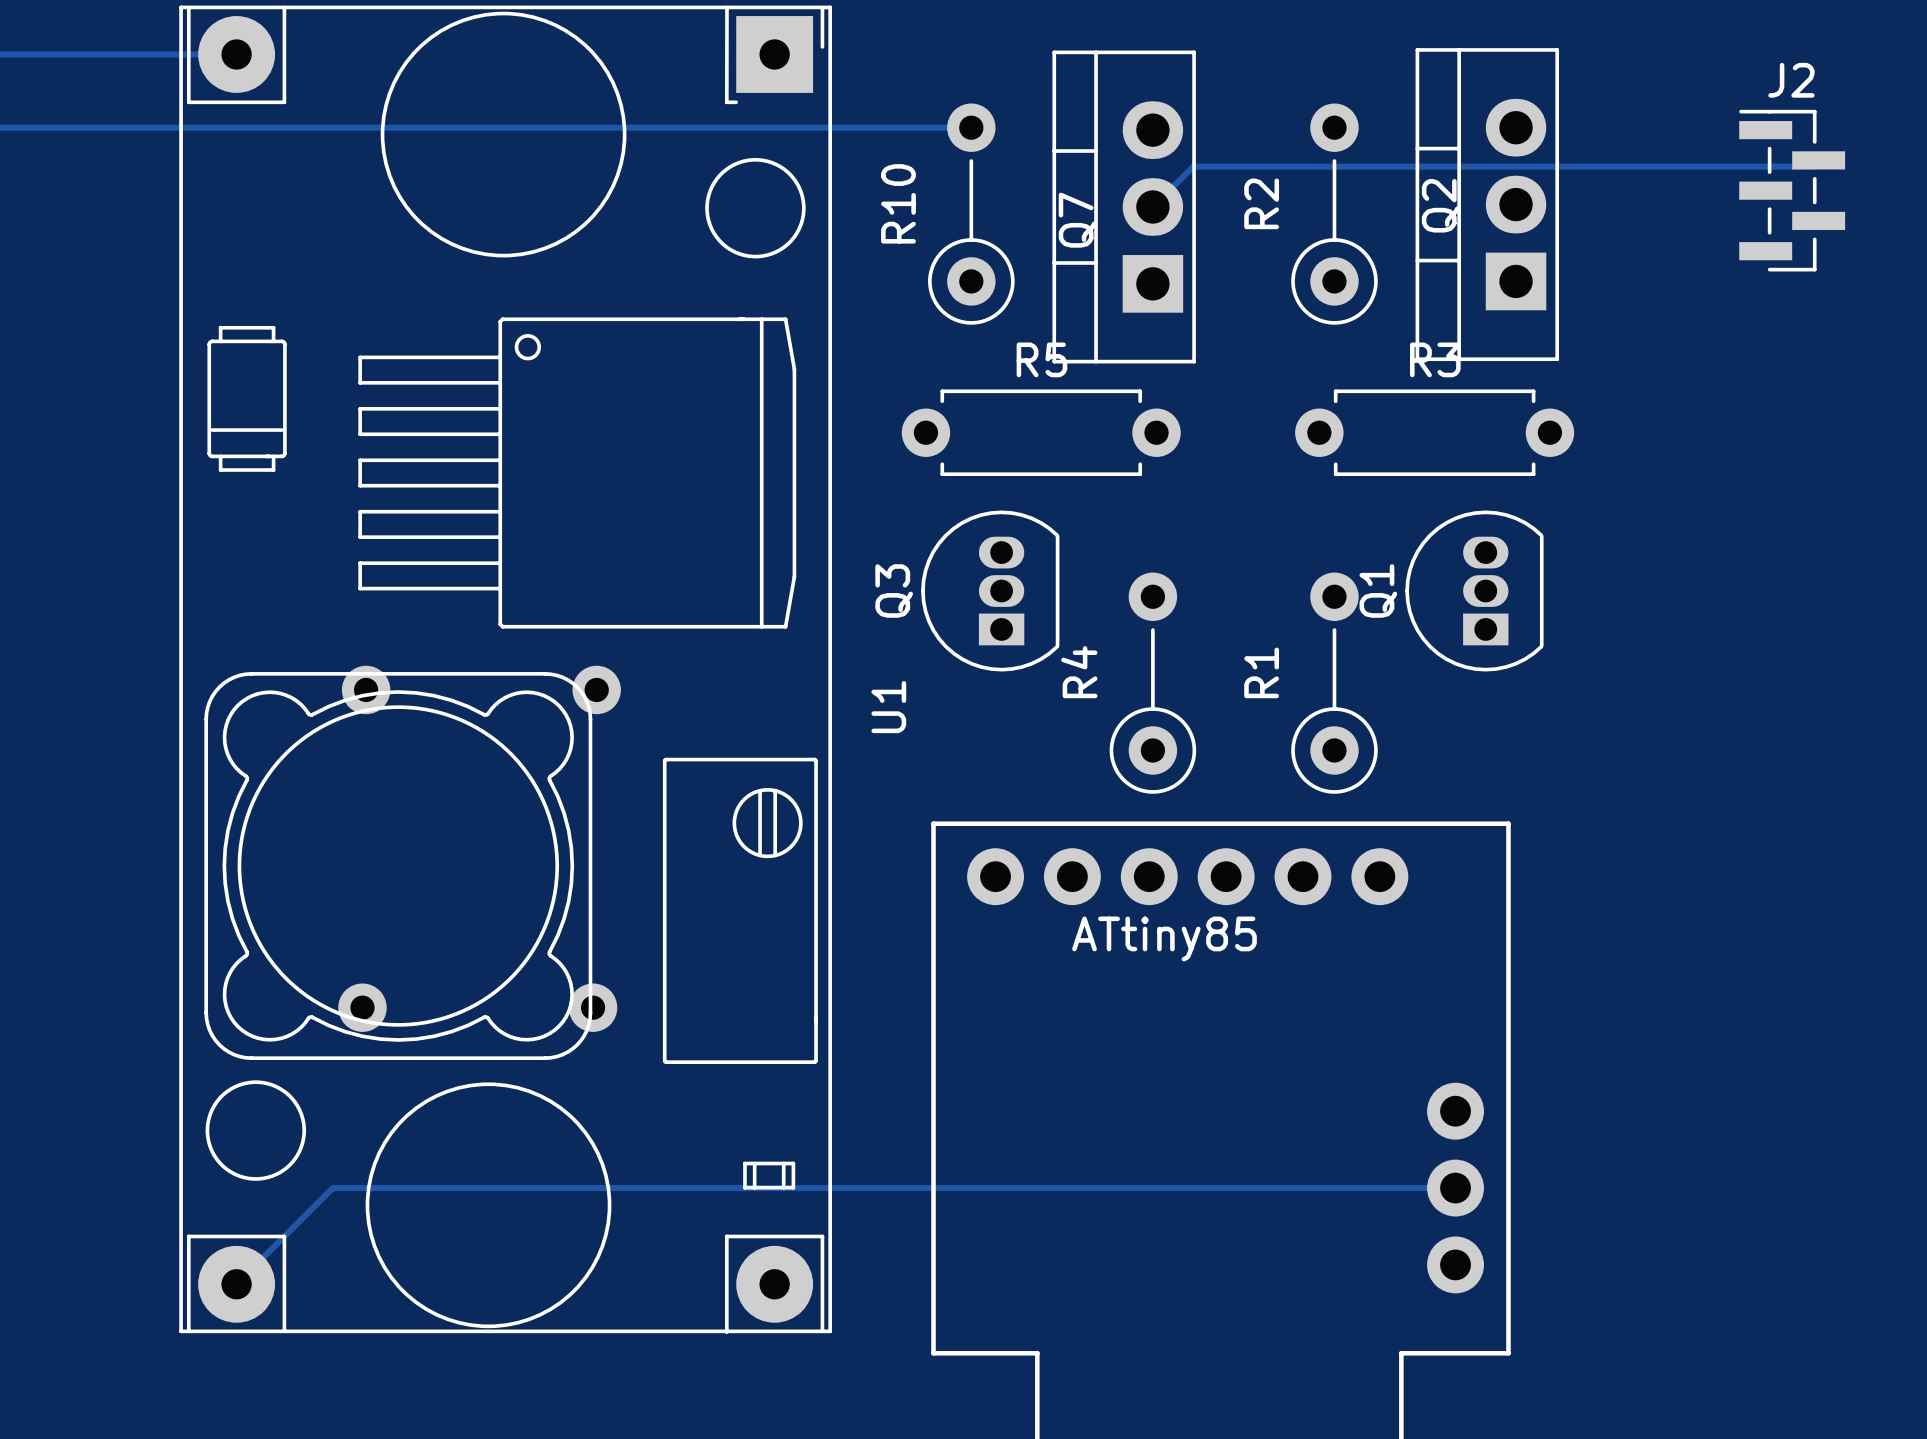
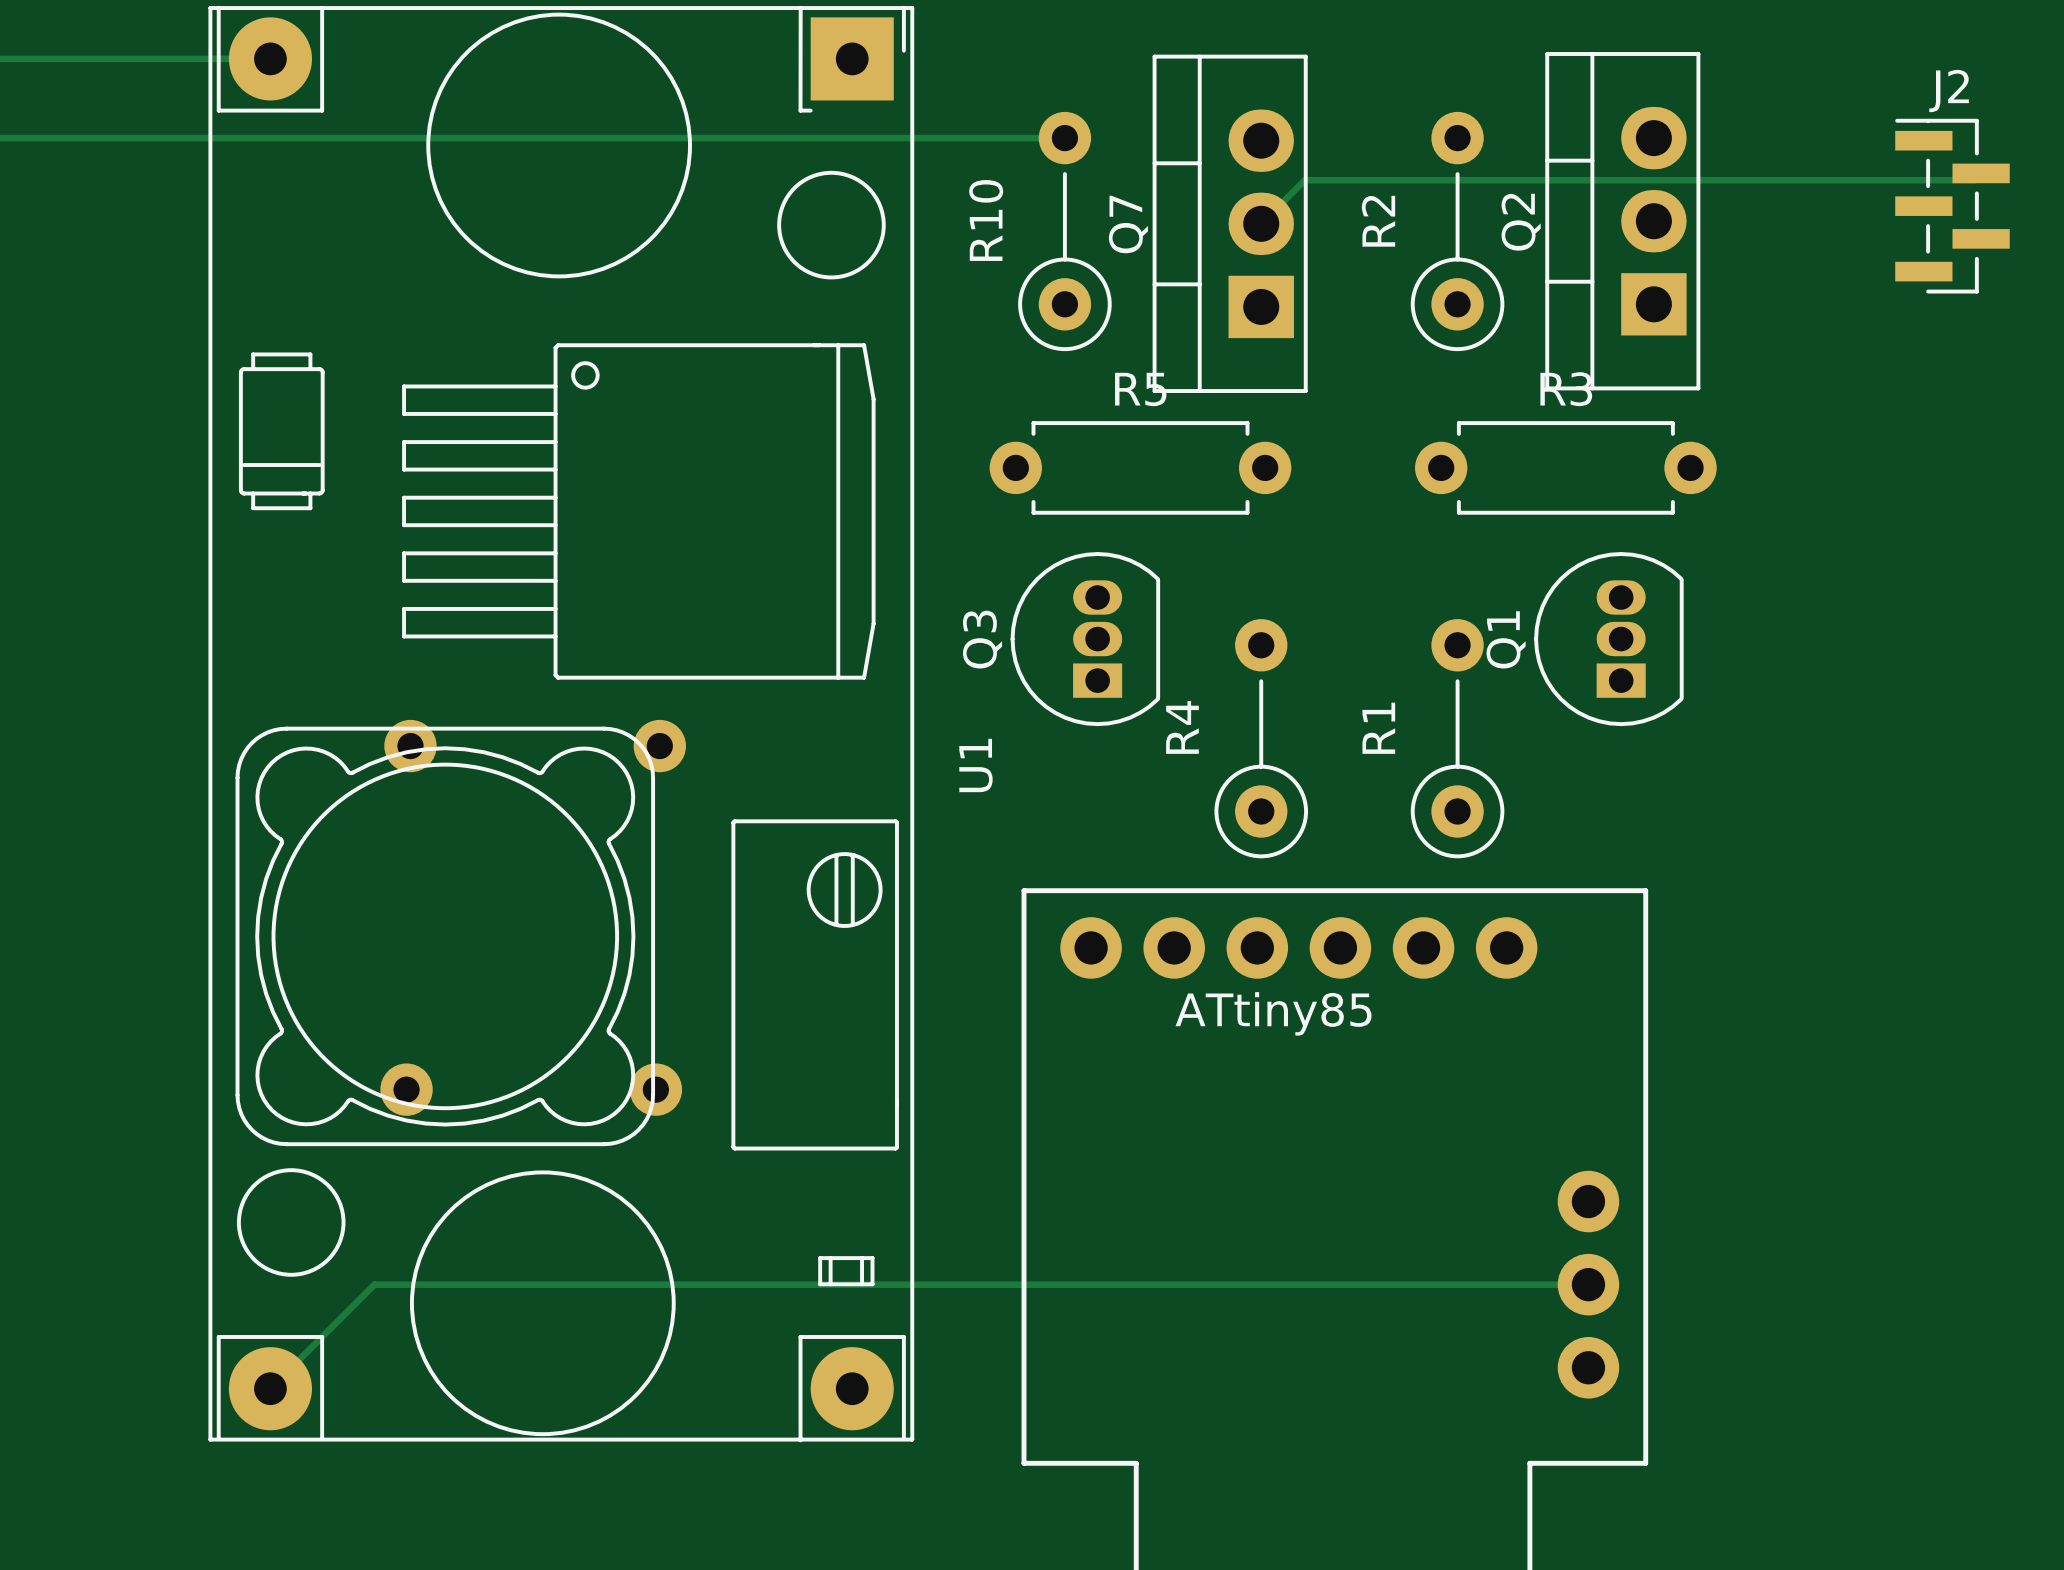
Q2 name position: Q2 (1440, 205) -> Q2 (1521, 222)
Q7 name position: Q7 (1077, 220) -> Q7 (1128, 224)

